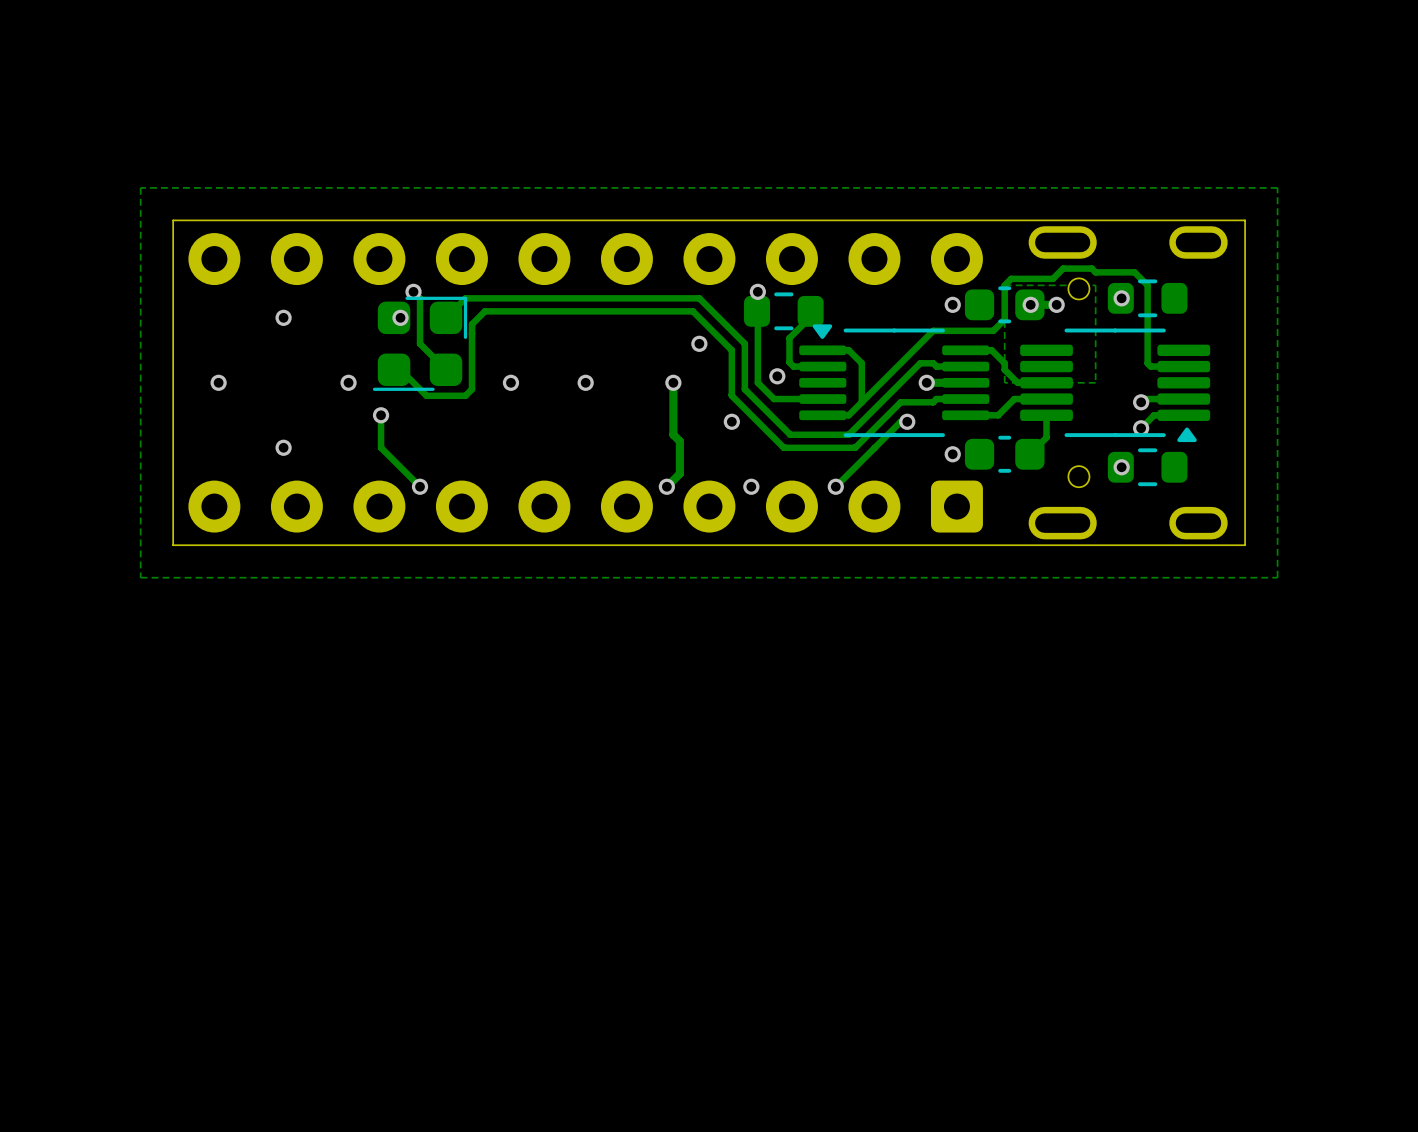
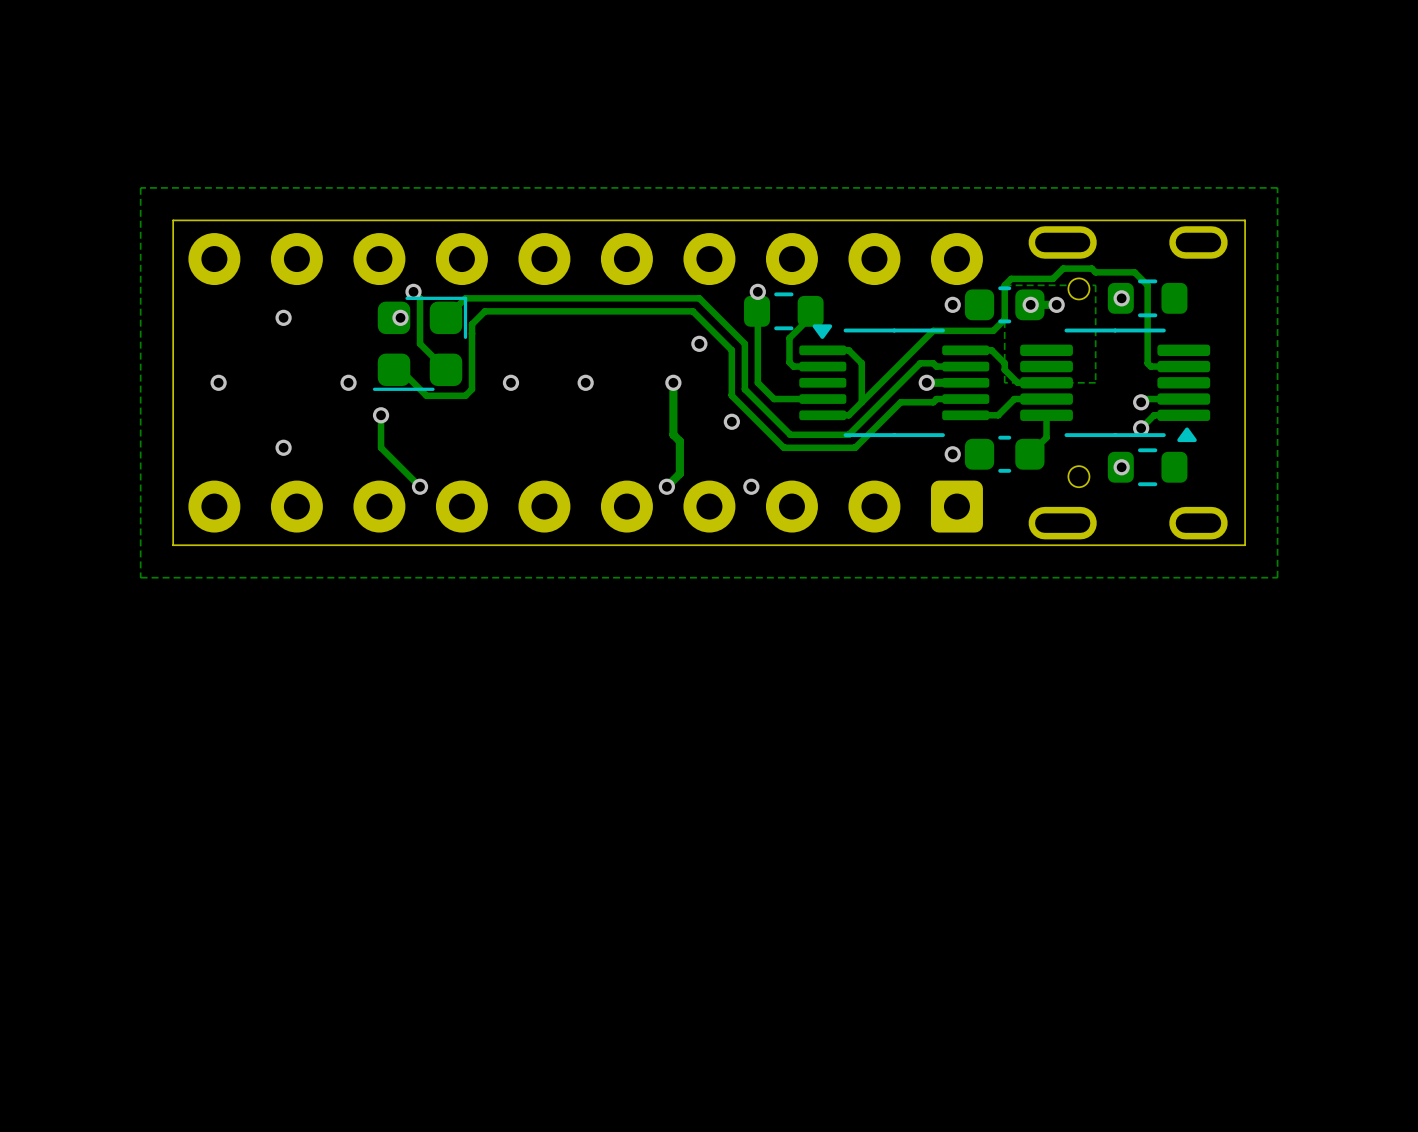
via: (777, 376) -> none
track: (907, 421) (900, 421) (835, 486) -> none
via: (907, 421) -> none
via: (835, 486) -> none

